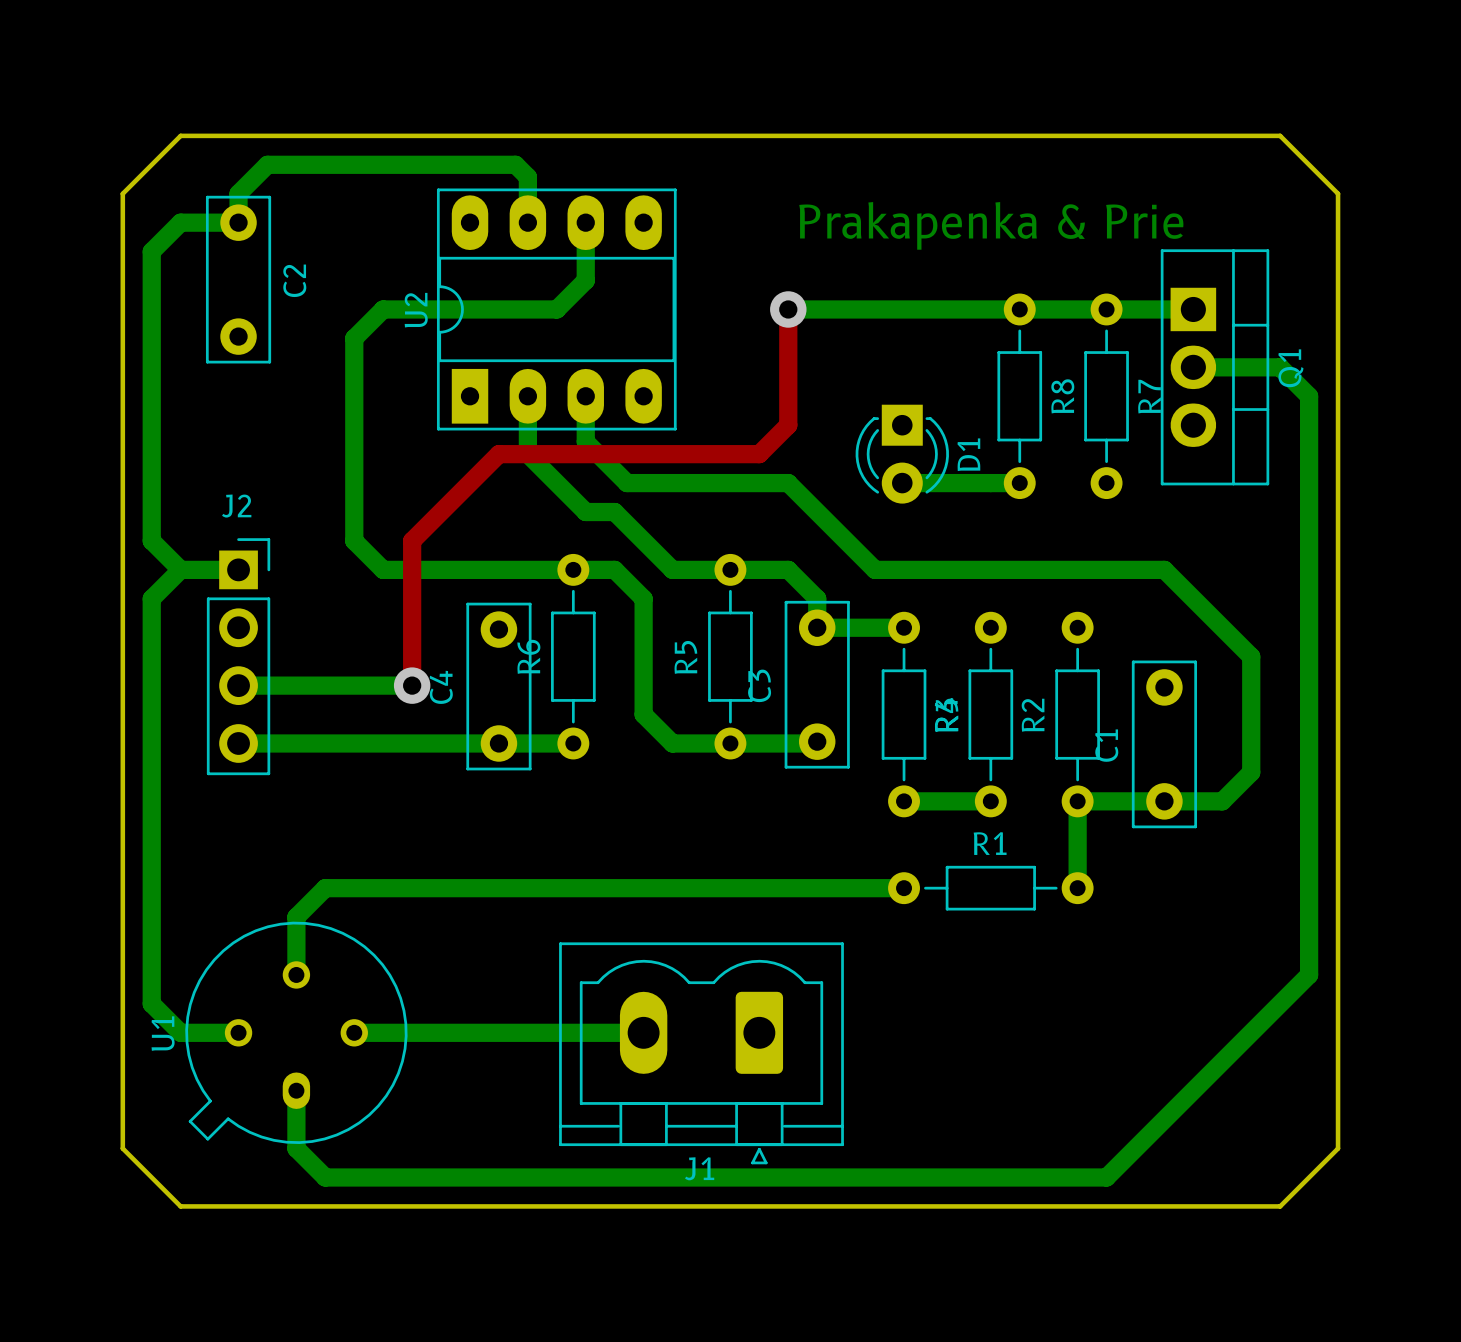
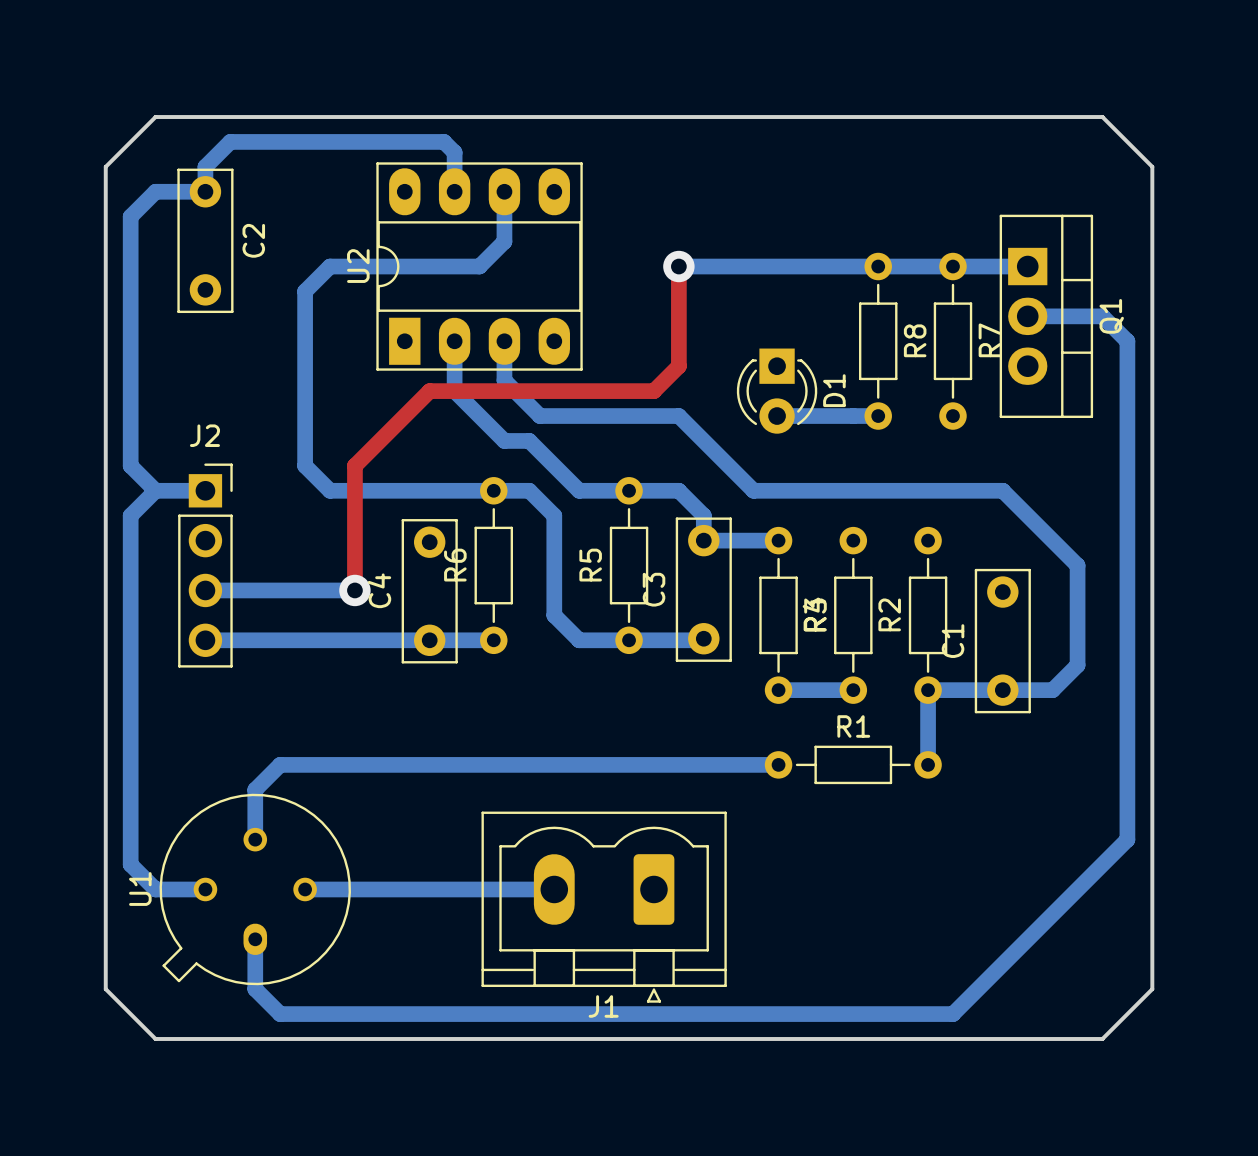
text: Prakapenka & Prie (991, 225) -> none

